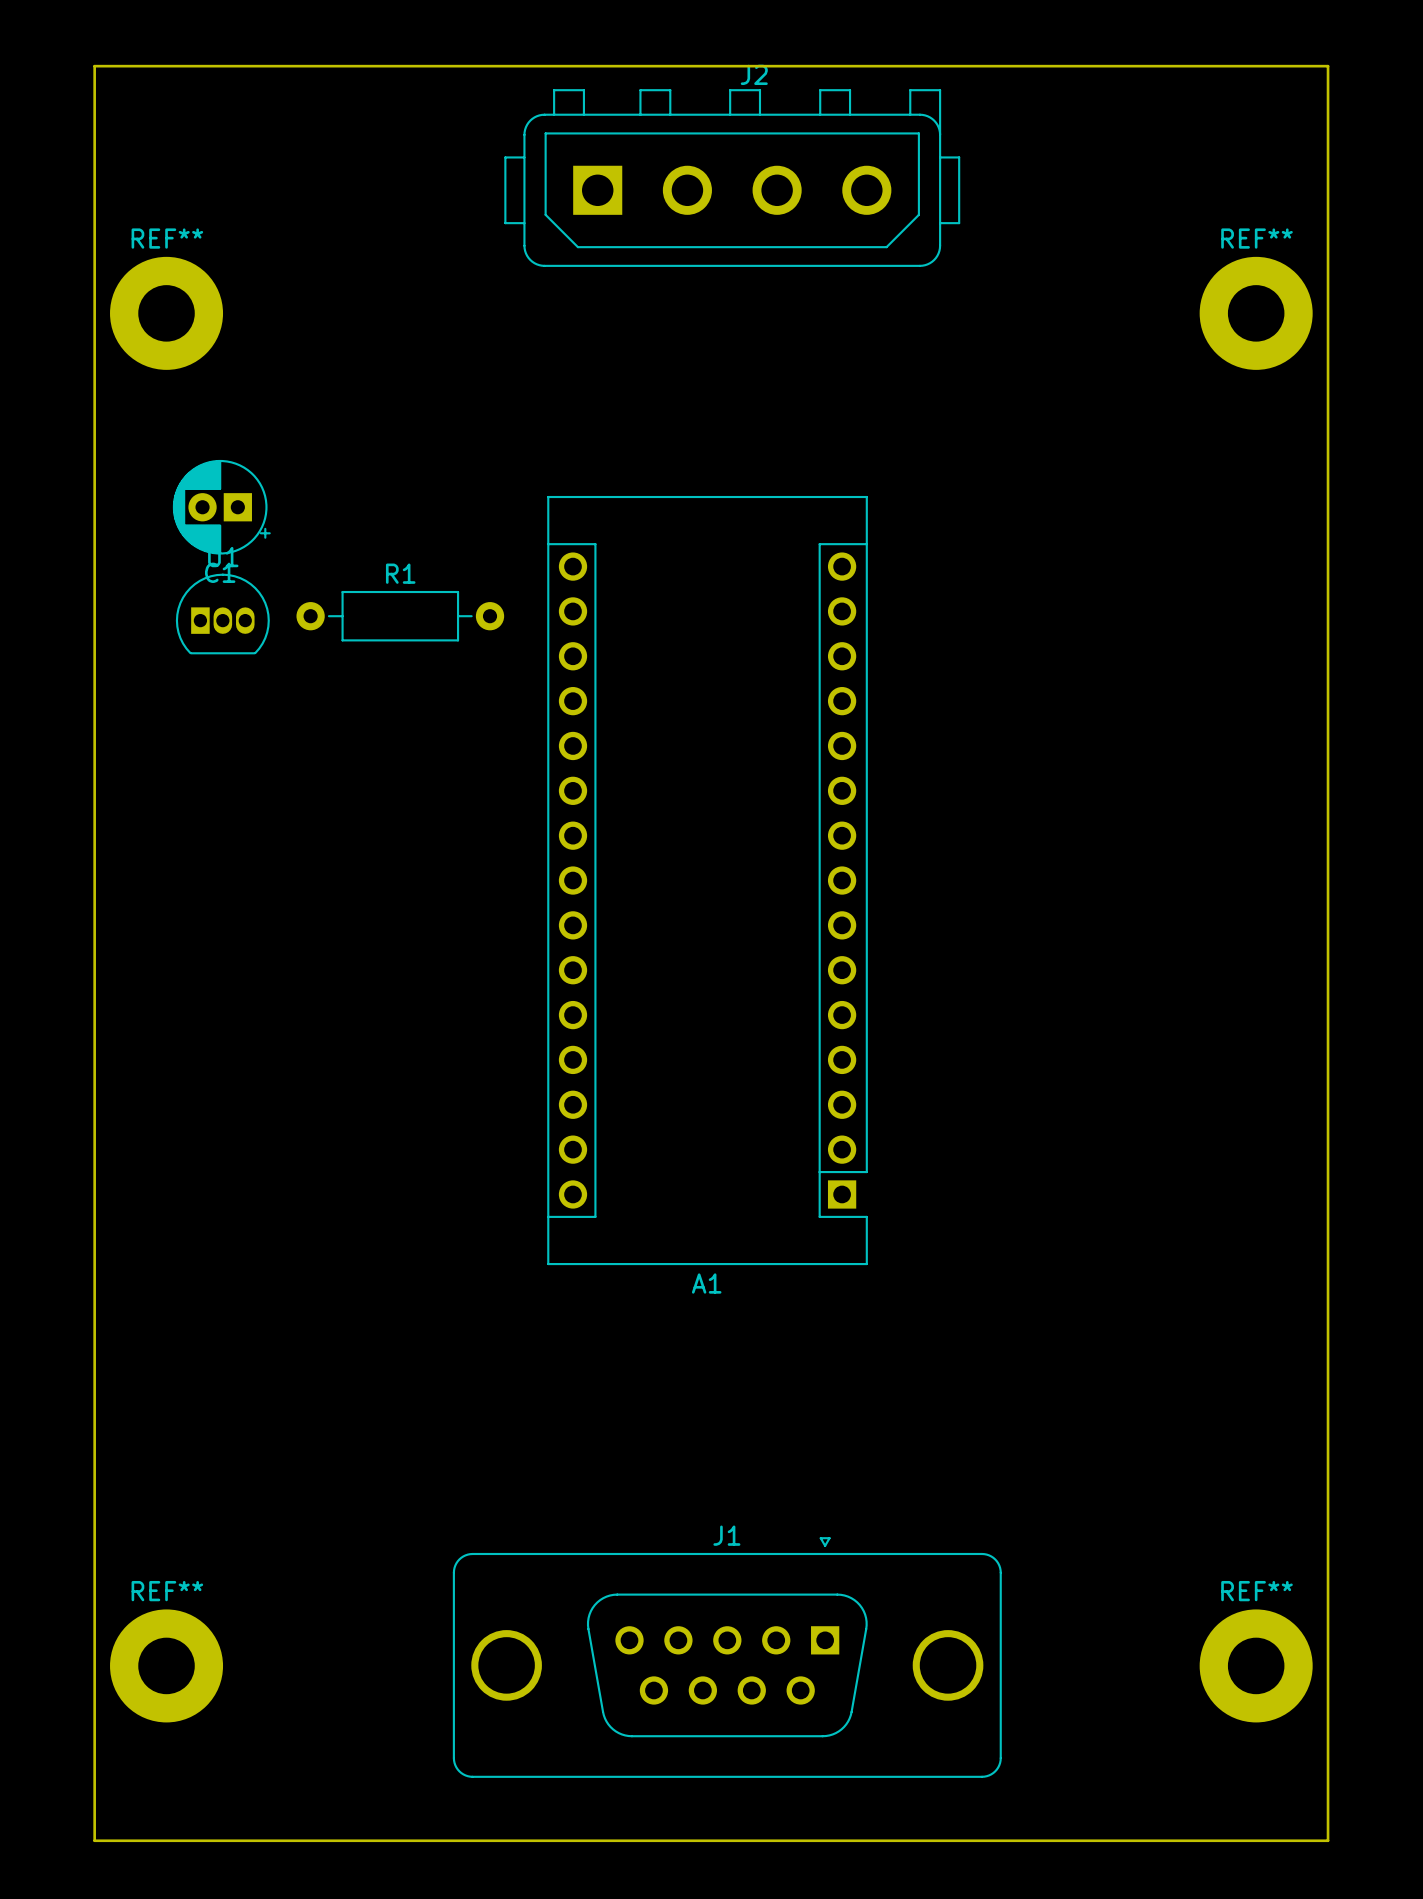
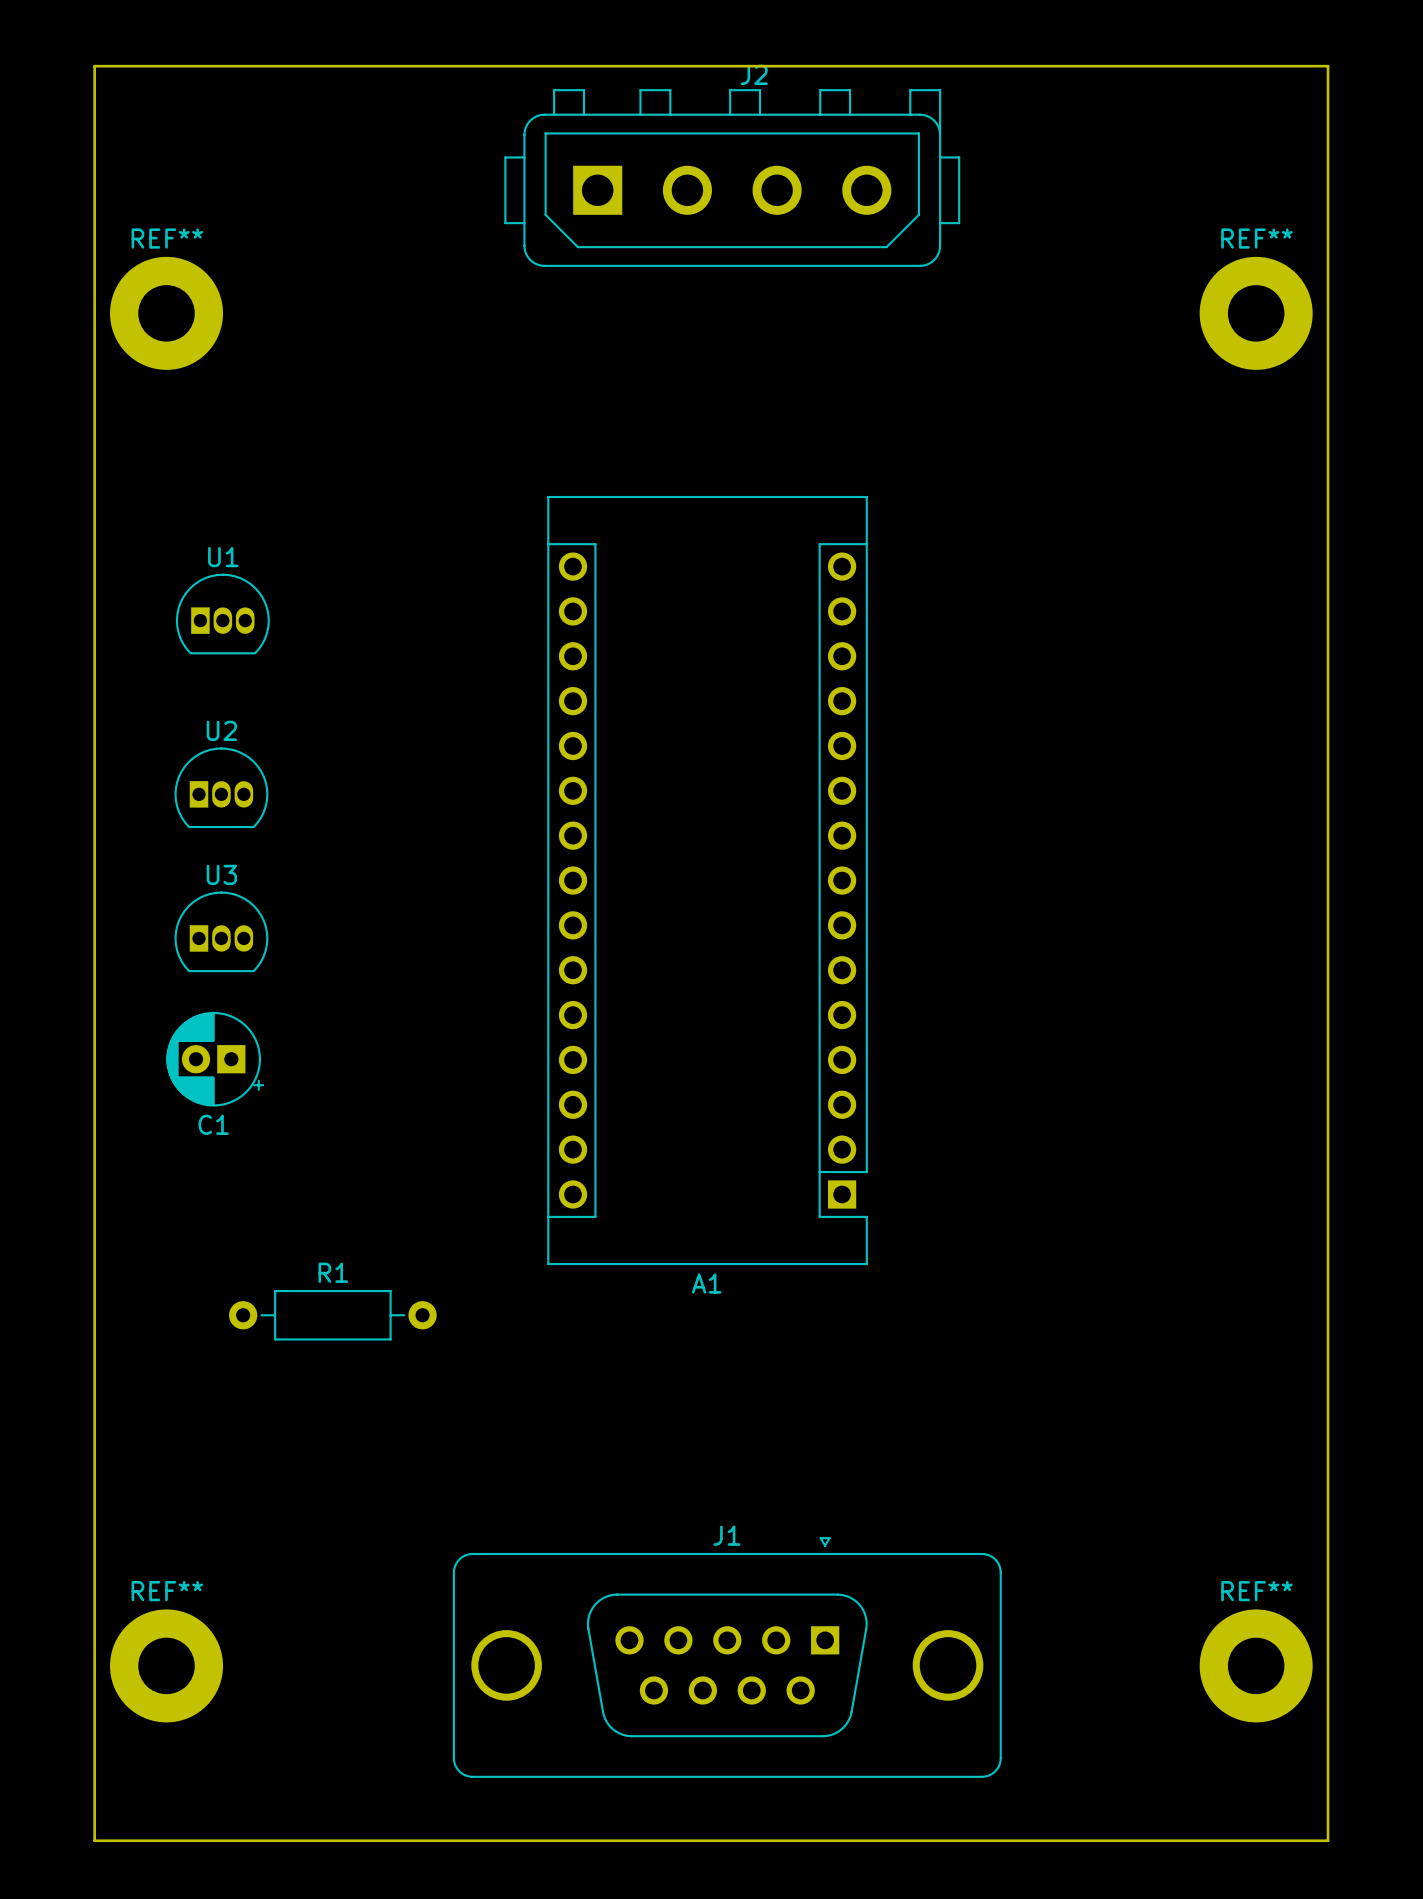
C1 position: (221, 507) -> (215, 1059)
R1 position: (400, 616) -> (332, 1315)
U2: none -> (221, 787)
U3: none -> (221, 931)

